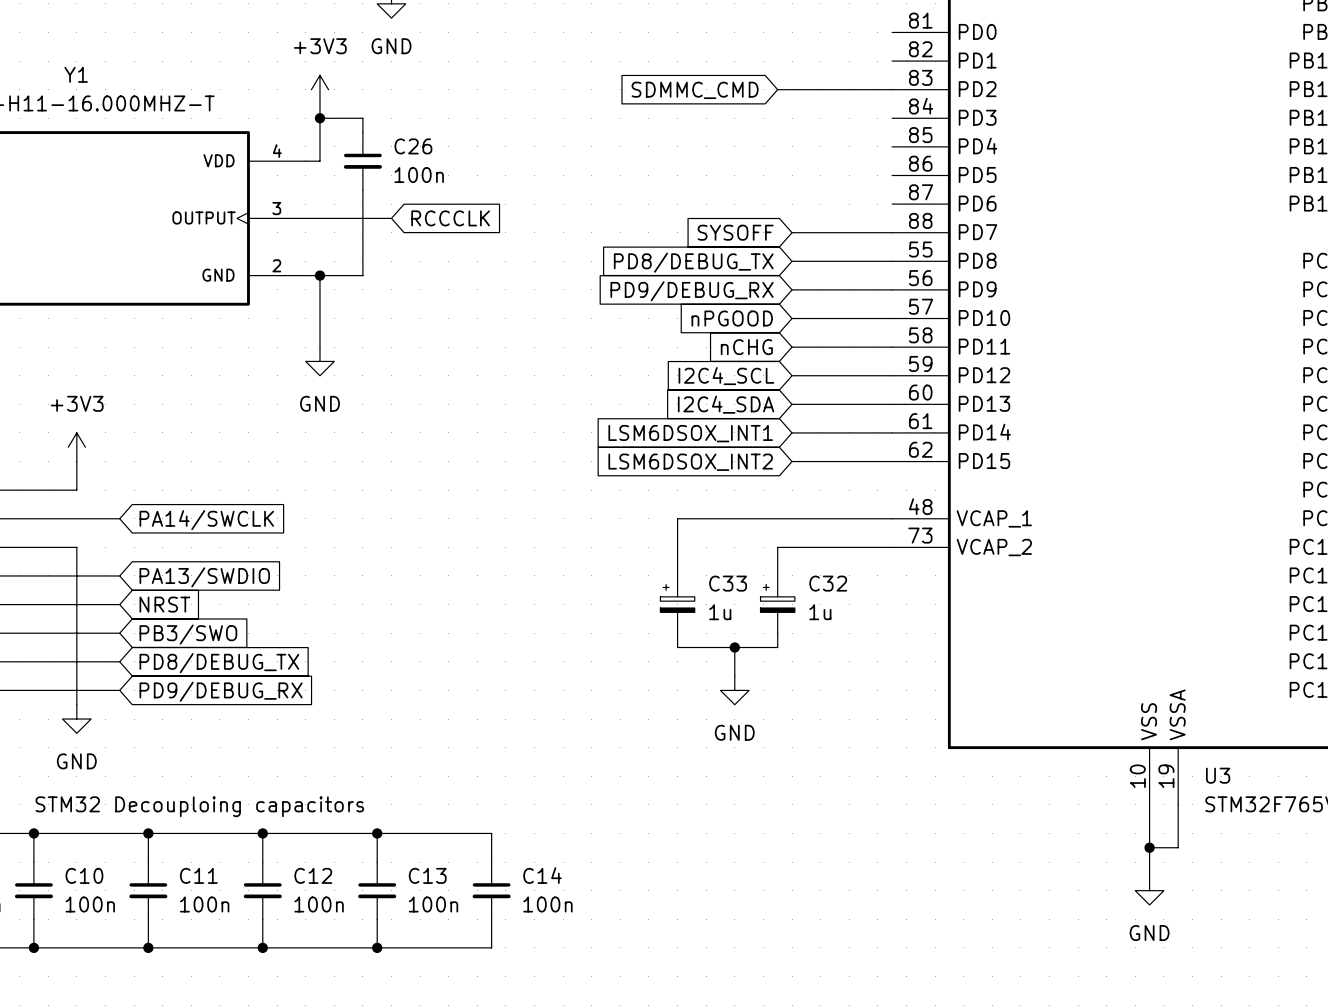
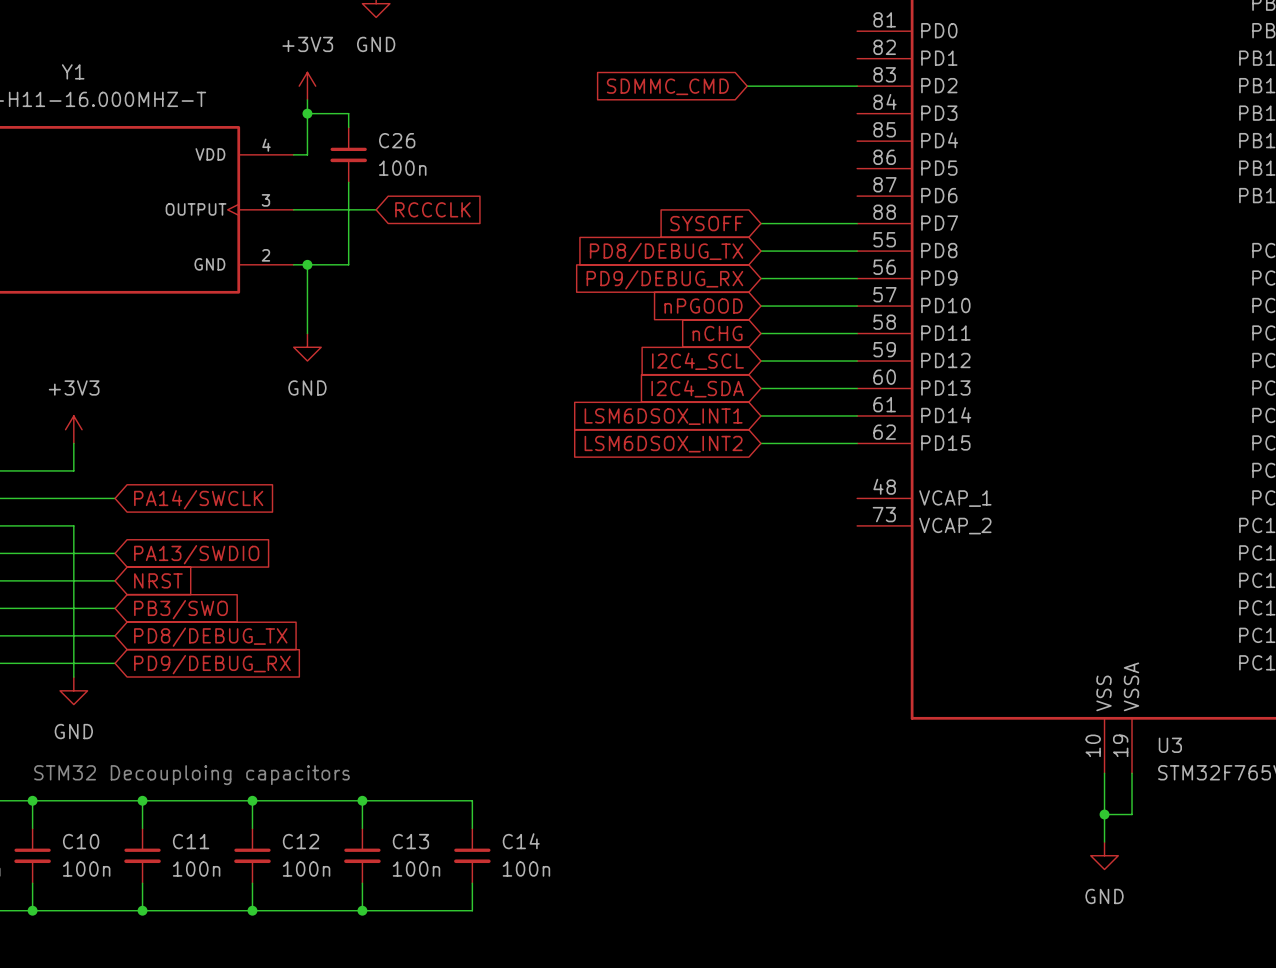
wire: (892, 518) (677, 518) (677, 575) -> none
wire: (892, 547) (777, 547) (777, 575) -> none
C33: 1u (677, 604) -> none
C32: 1u (777, 604) -> none
wire: (677, 633) (677, 647) (777, 647) (777, 633) -> none
wire: (734, 647) (734, 676) -> none
junction: (734, 647) -> none
power symbol: GND (734, 690) -> none

